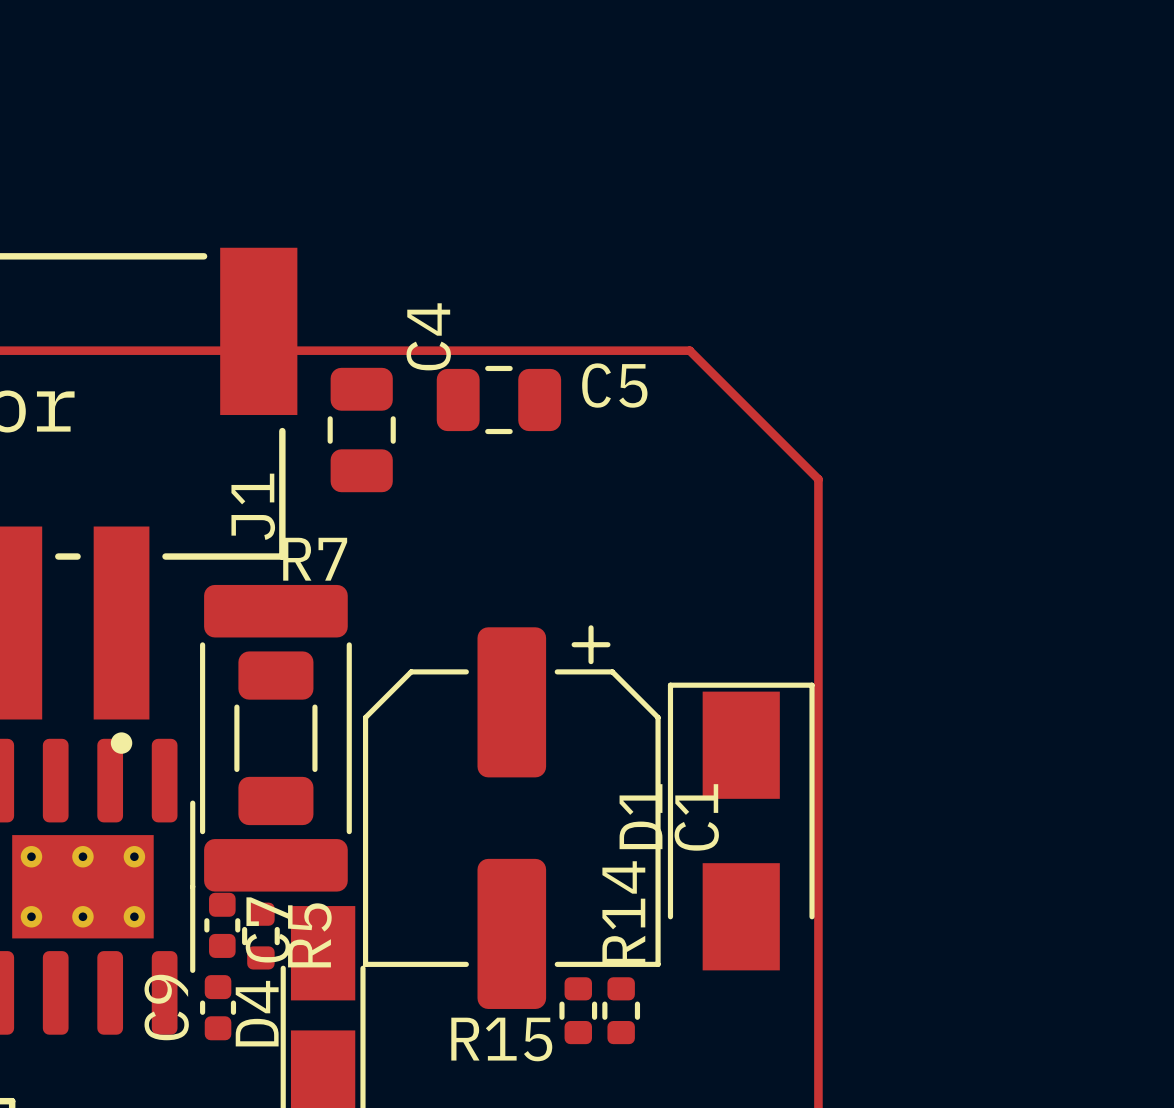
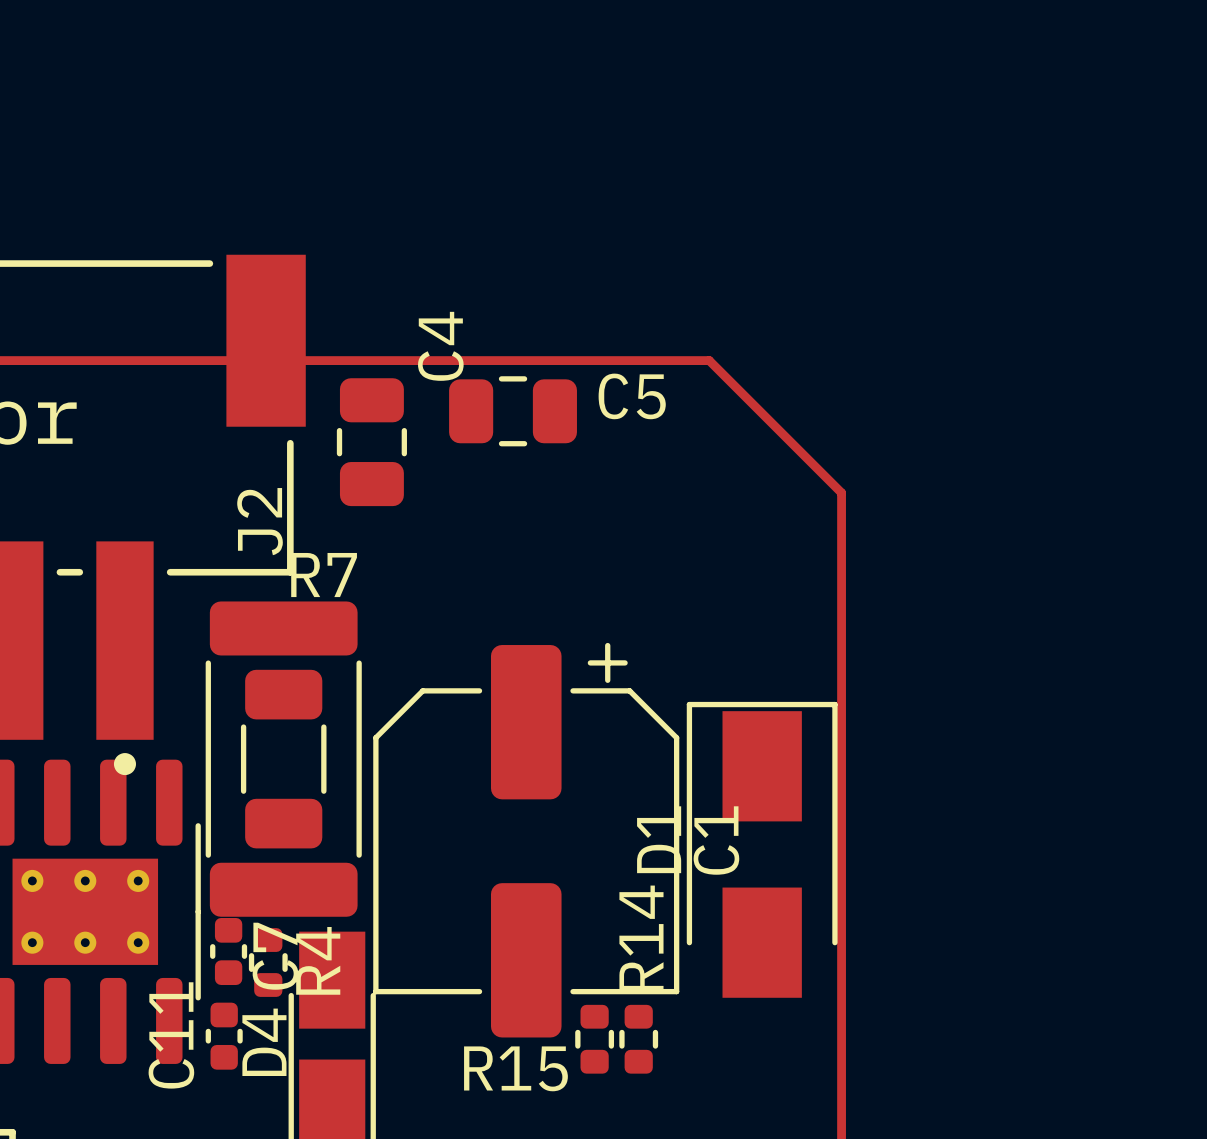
J1 name: J1 (253, 506) -> J2 (260, 521)
R5 name: R5 (309, 935) -> R4 (318, 960)
C9 name: C9 (166, 1007) -> C11 (171, 1035)

